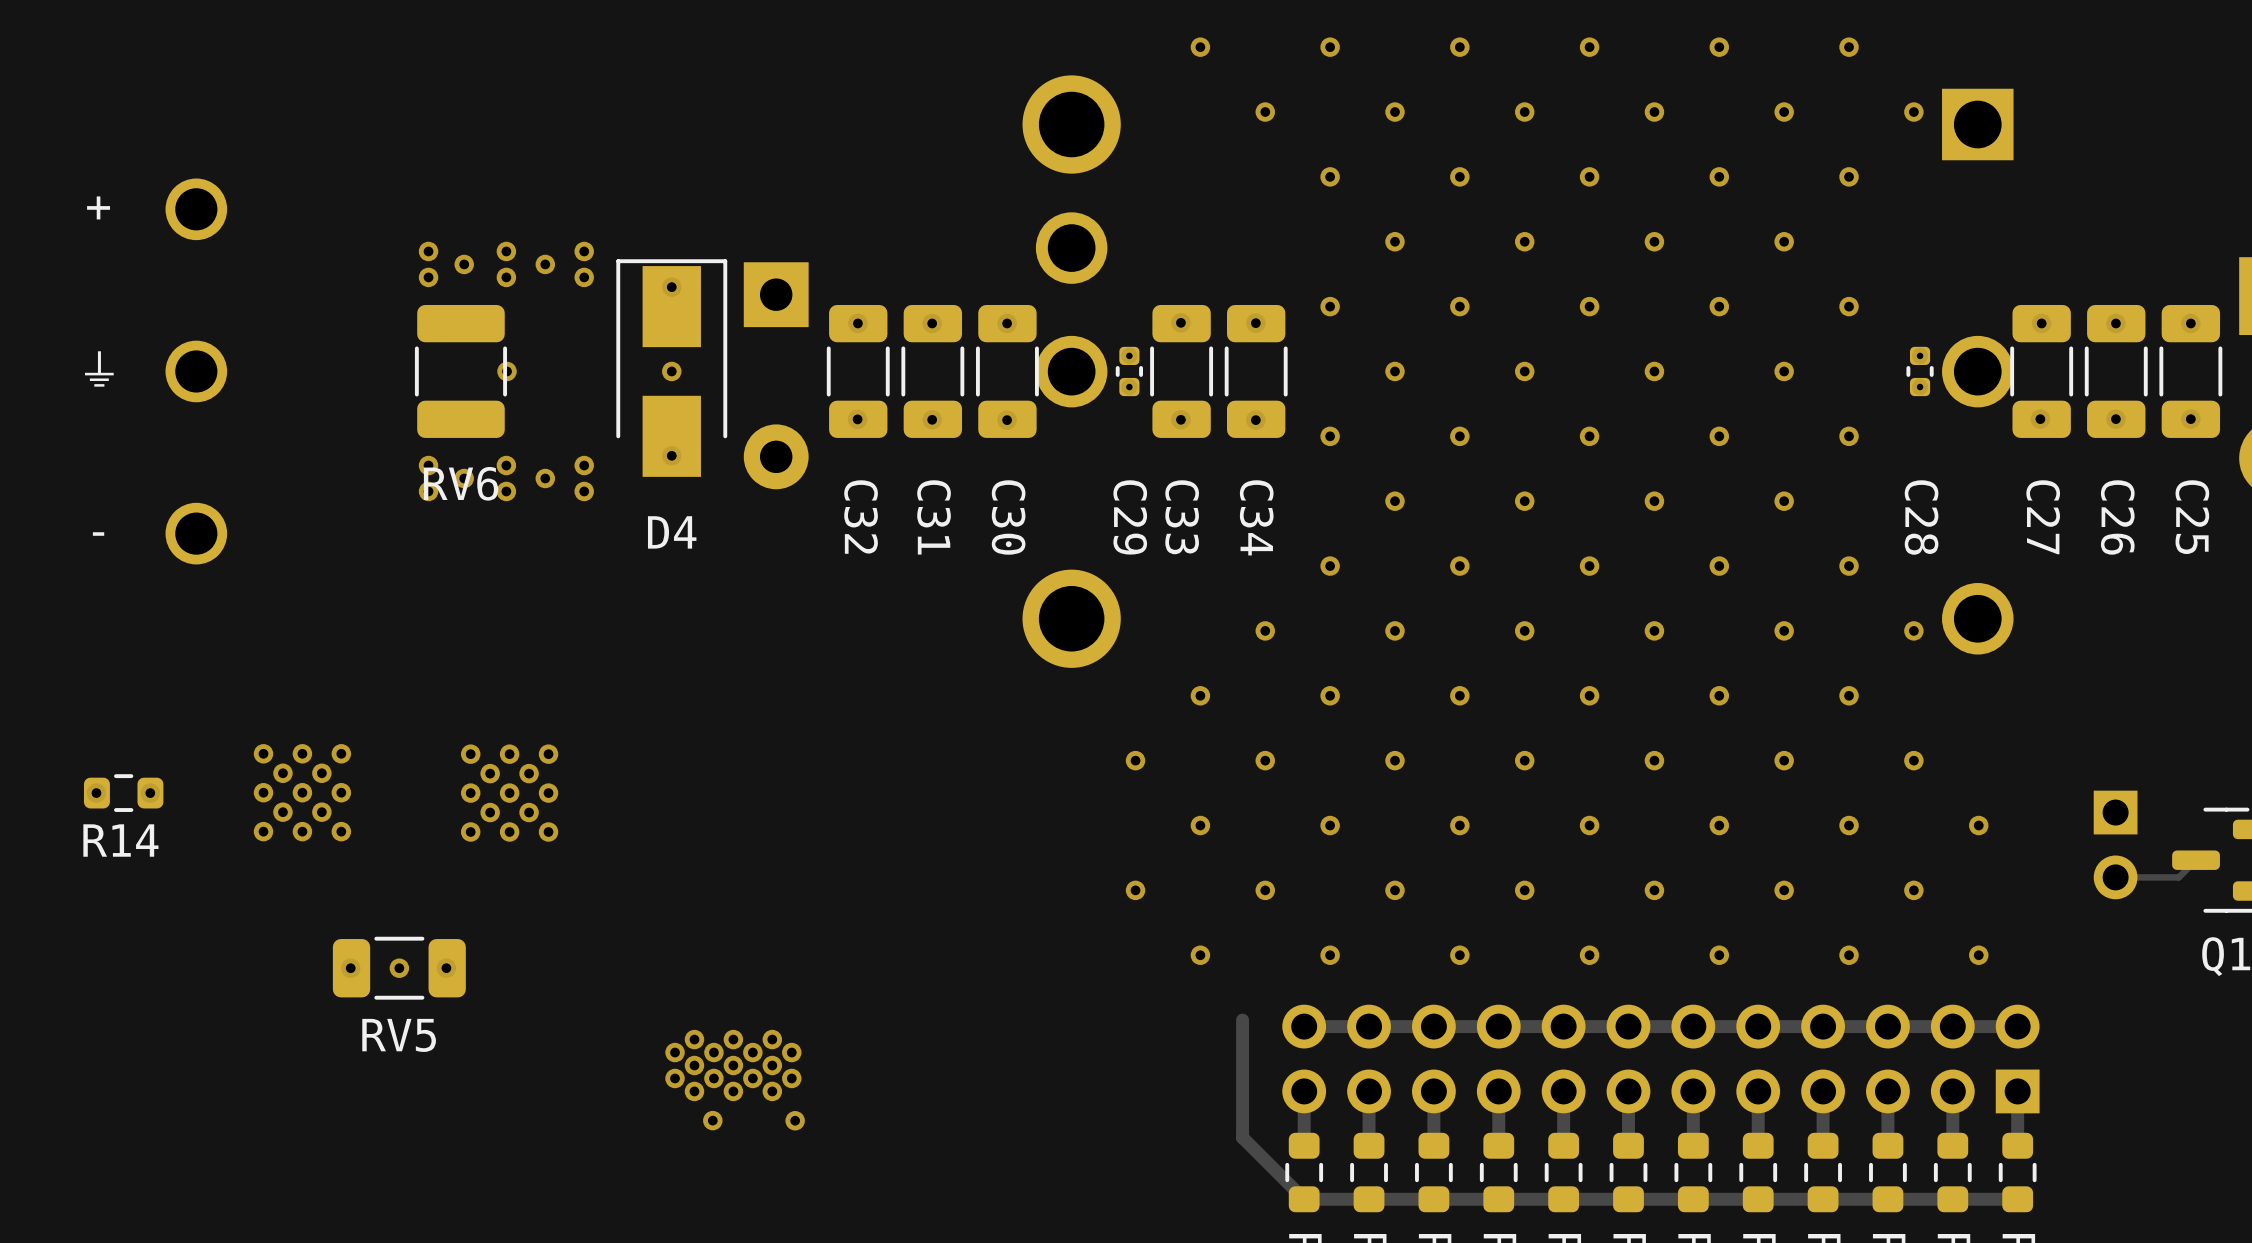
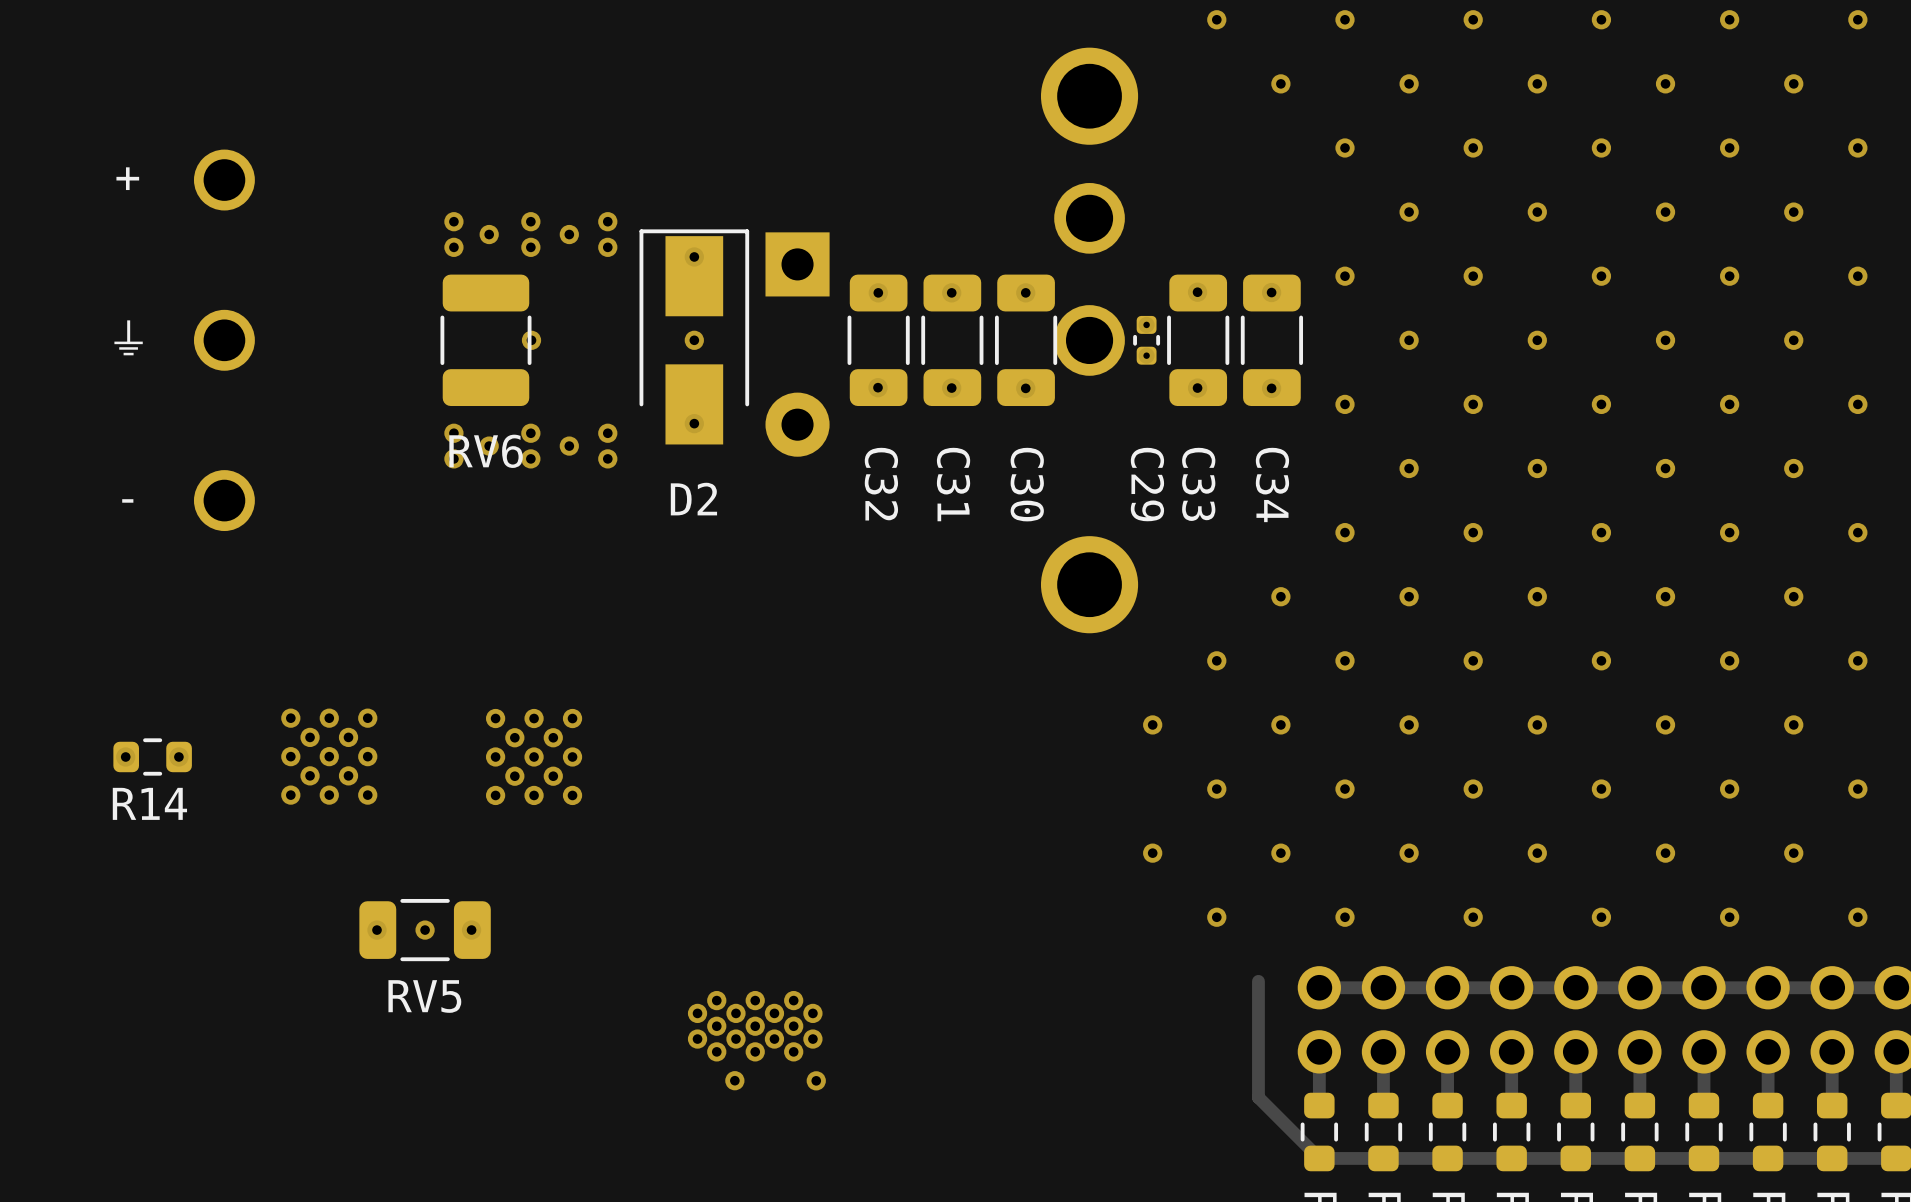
D4 name: D4 (672, 532) -> D2 (693, 499)

